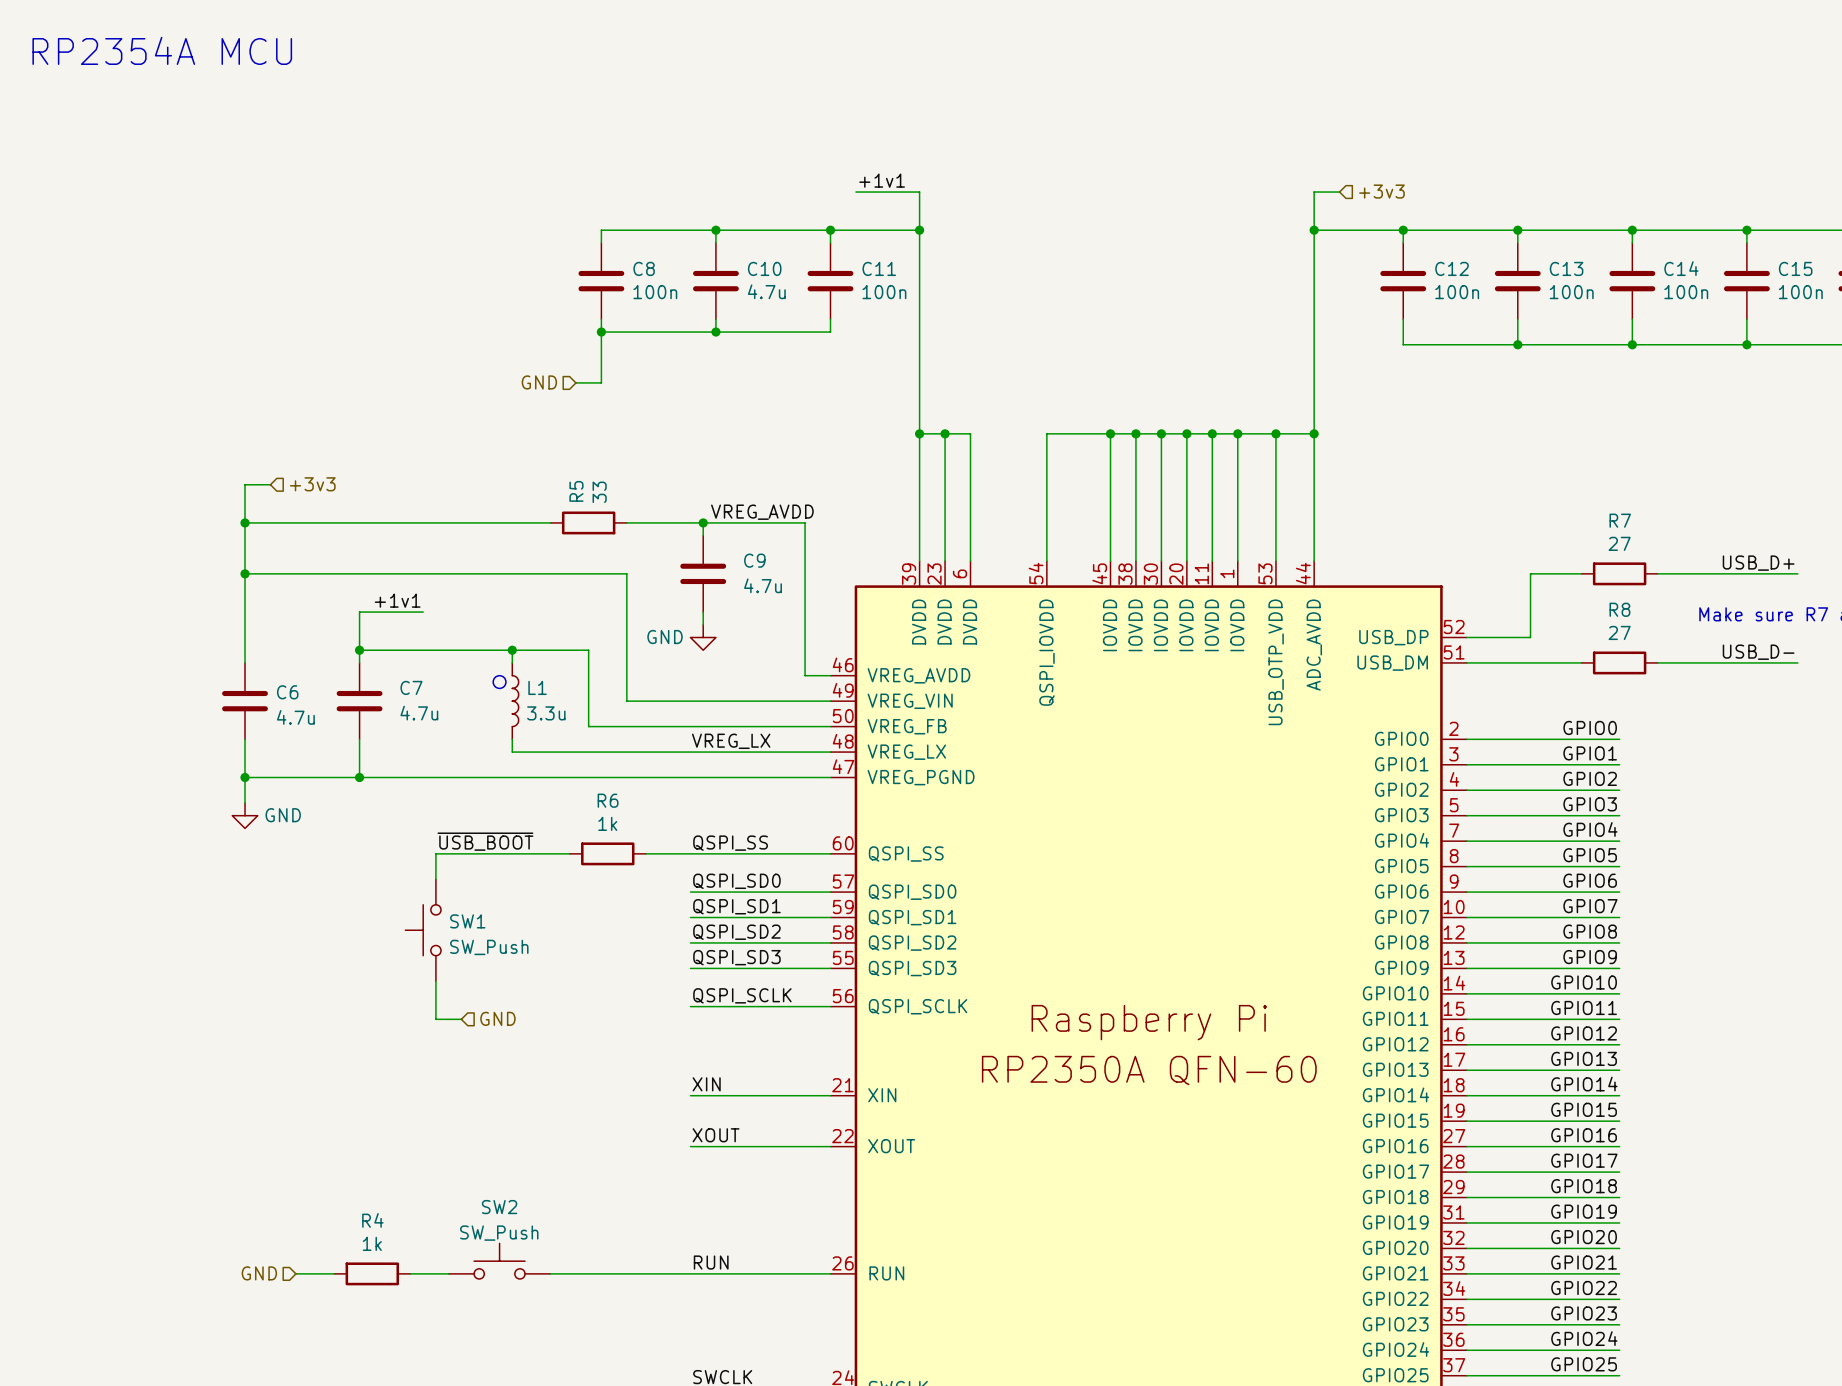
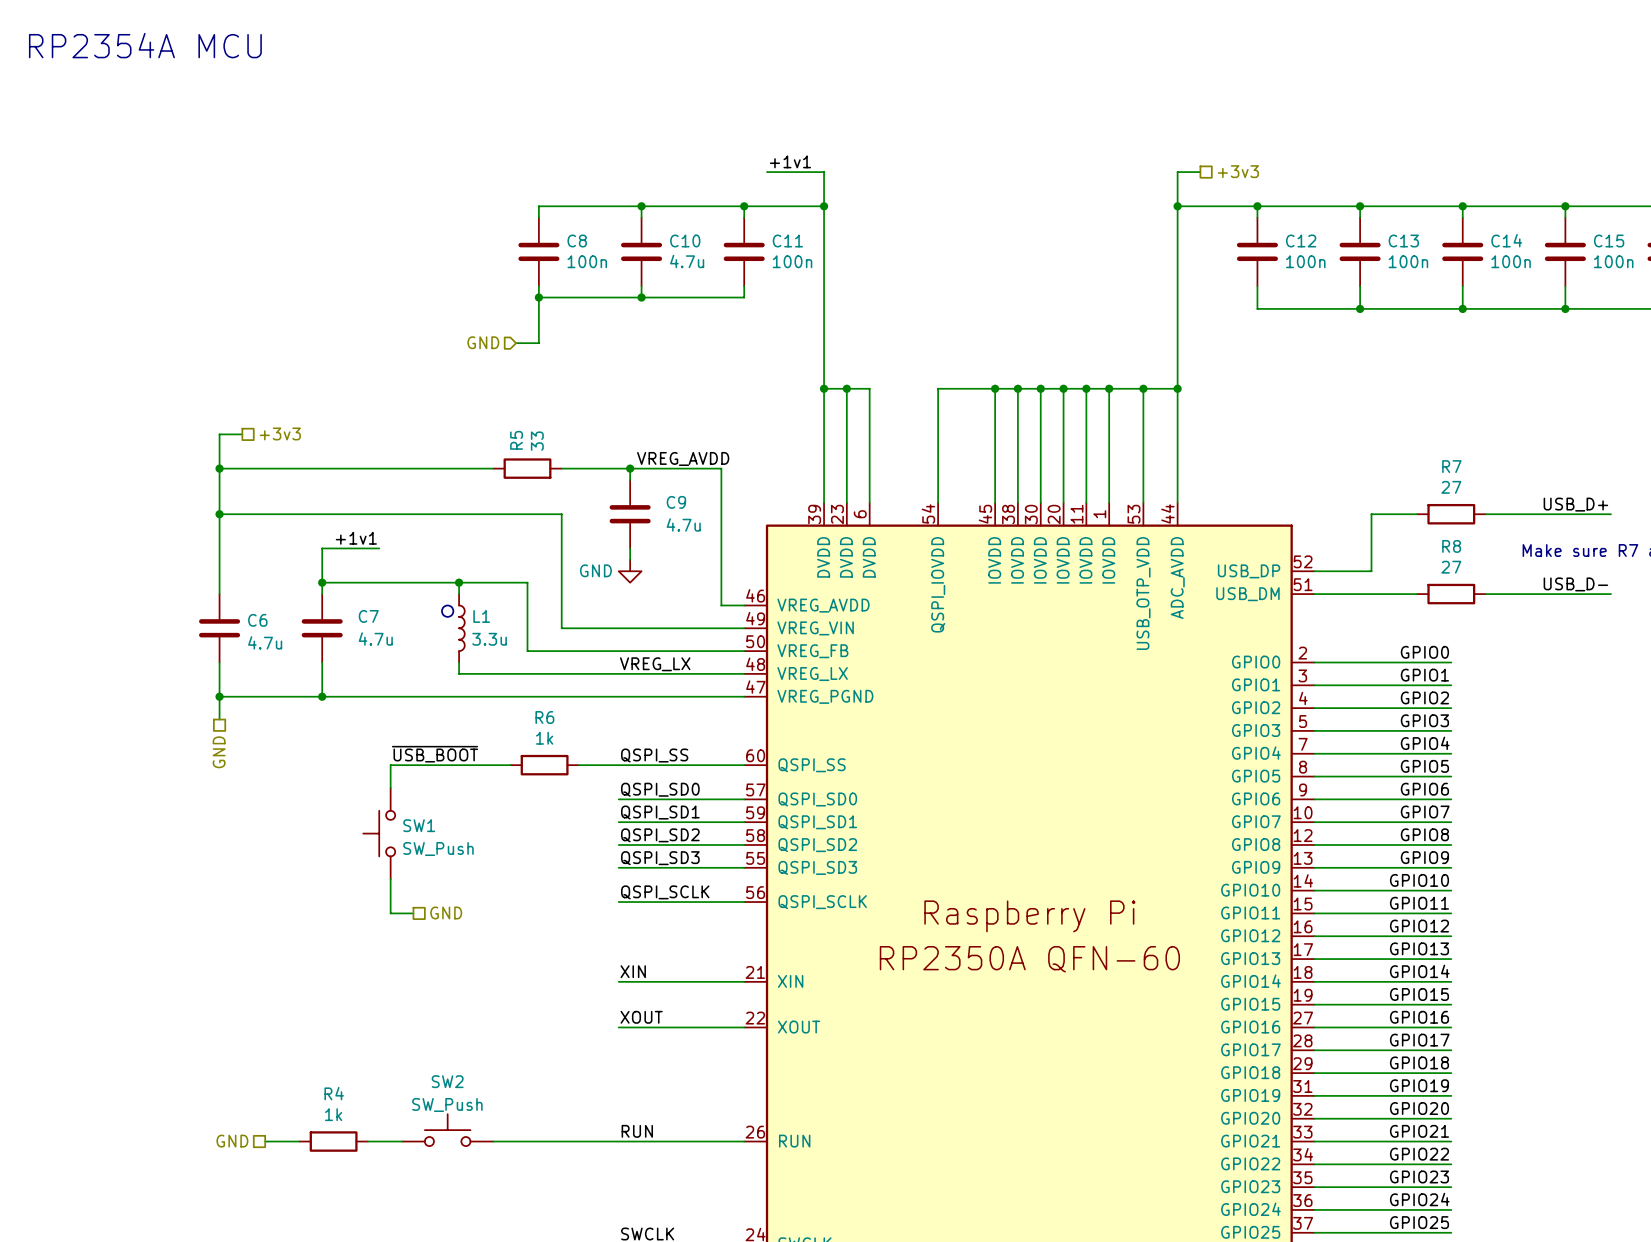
hierarchical label shape: input (1381, 191) -> passive (1238, 171)
hierarchical label shape: input (312, 484) -> passive (280, 433)
power symbol: GND (245, 815) -> none
hierarchical label: none -> GND (219, 752)
hierarchical label shape: input (497, 1018) -> passive (446, 913)
hierarchical label shape: input (259, 1273) -> passive (232, 1141)

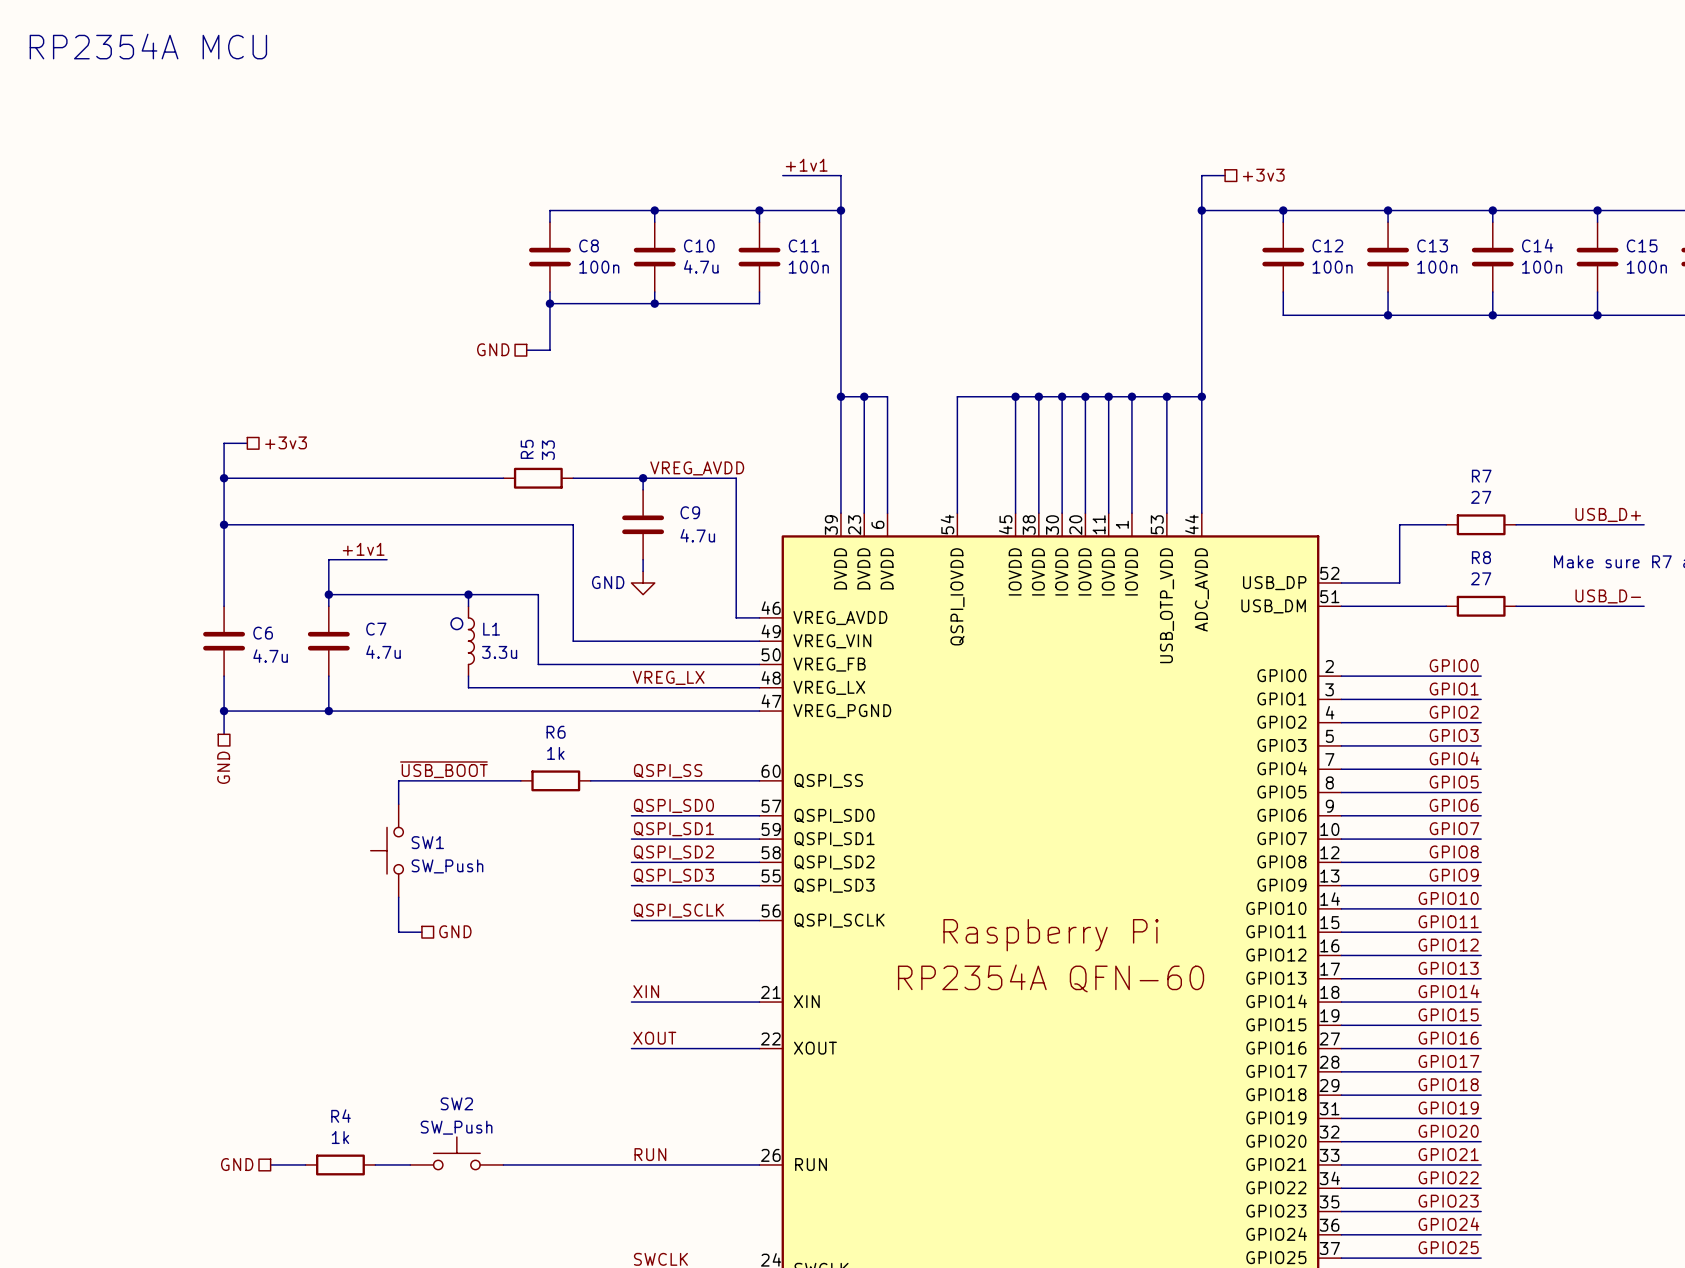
hierarchical label shape: input (483, 342) -> passive (493, 349)
part text: RP2350A QFN-60 (1029, 959) -> RP2354A QFN-60 (1051, 978)

